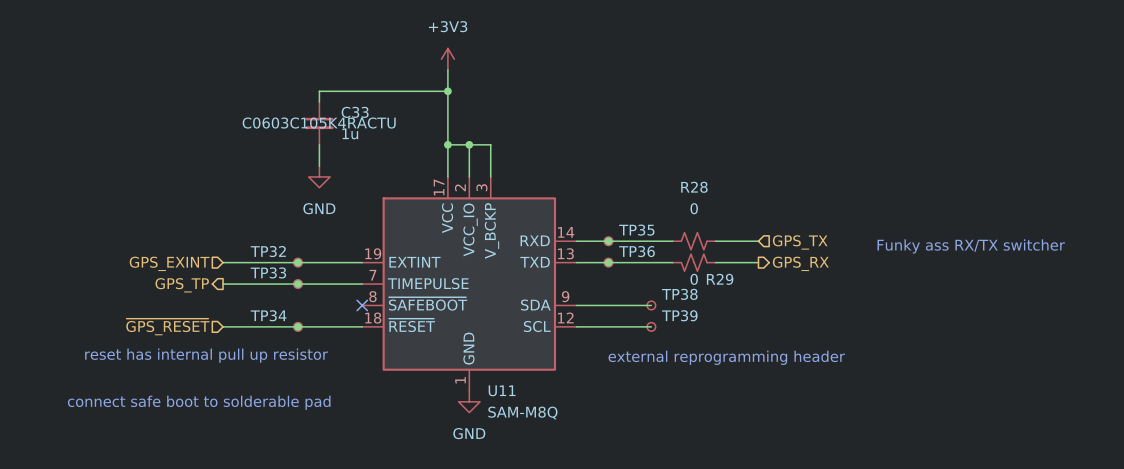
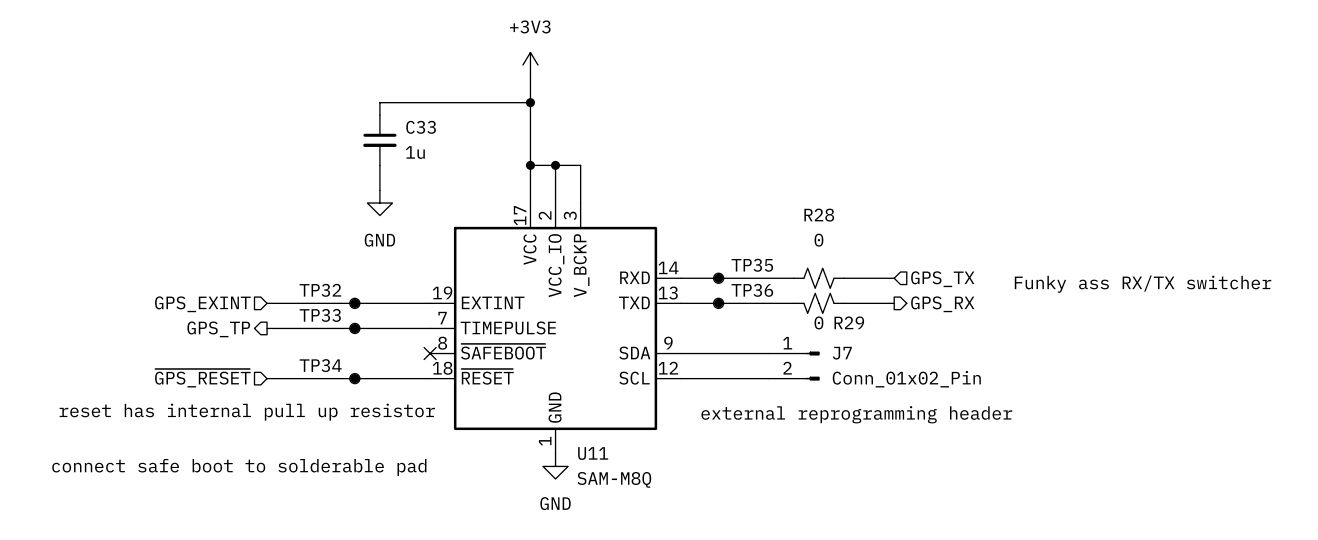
C33 text: C0603C105K4RACTU (319, 123) -> none
TP38: (651, 305) -> none
J7: none -> Conn_01x02_Pin (794, 366)
TP39: (651, 326) -> none

